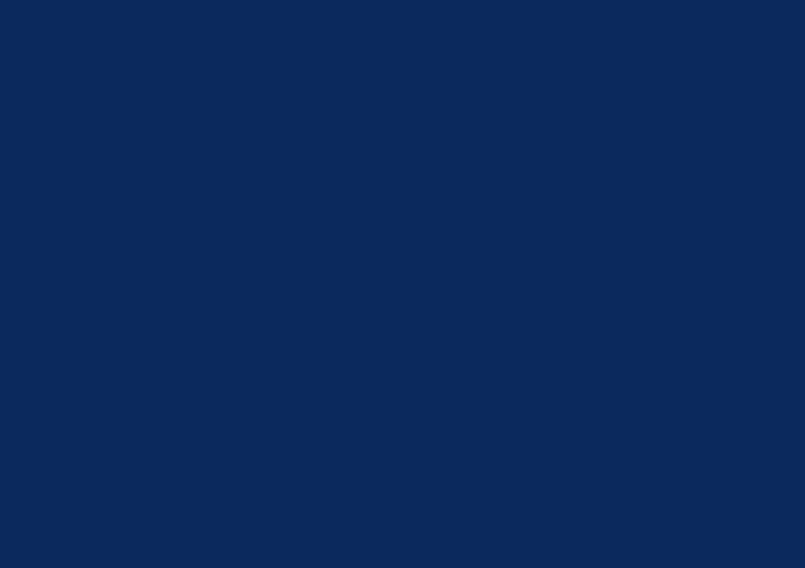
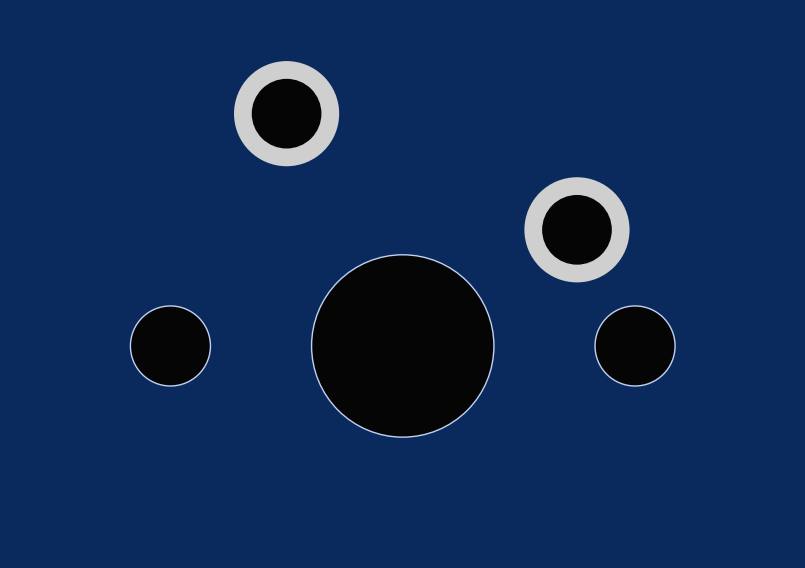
part: none -> (402, 249)

